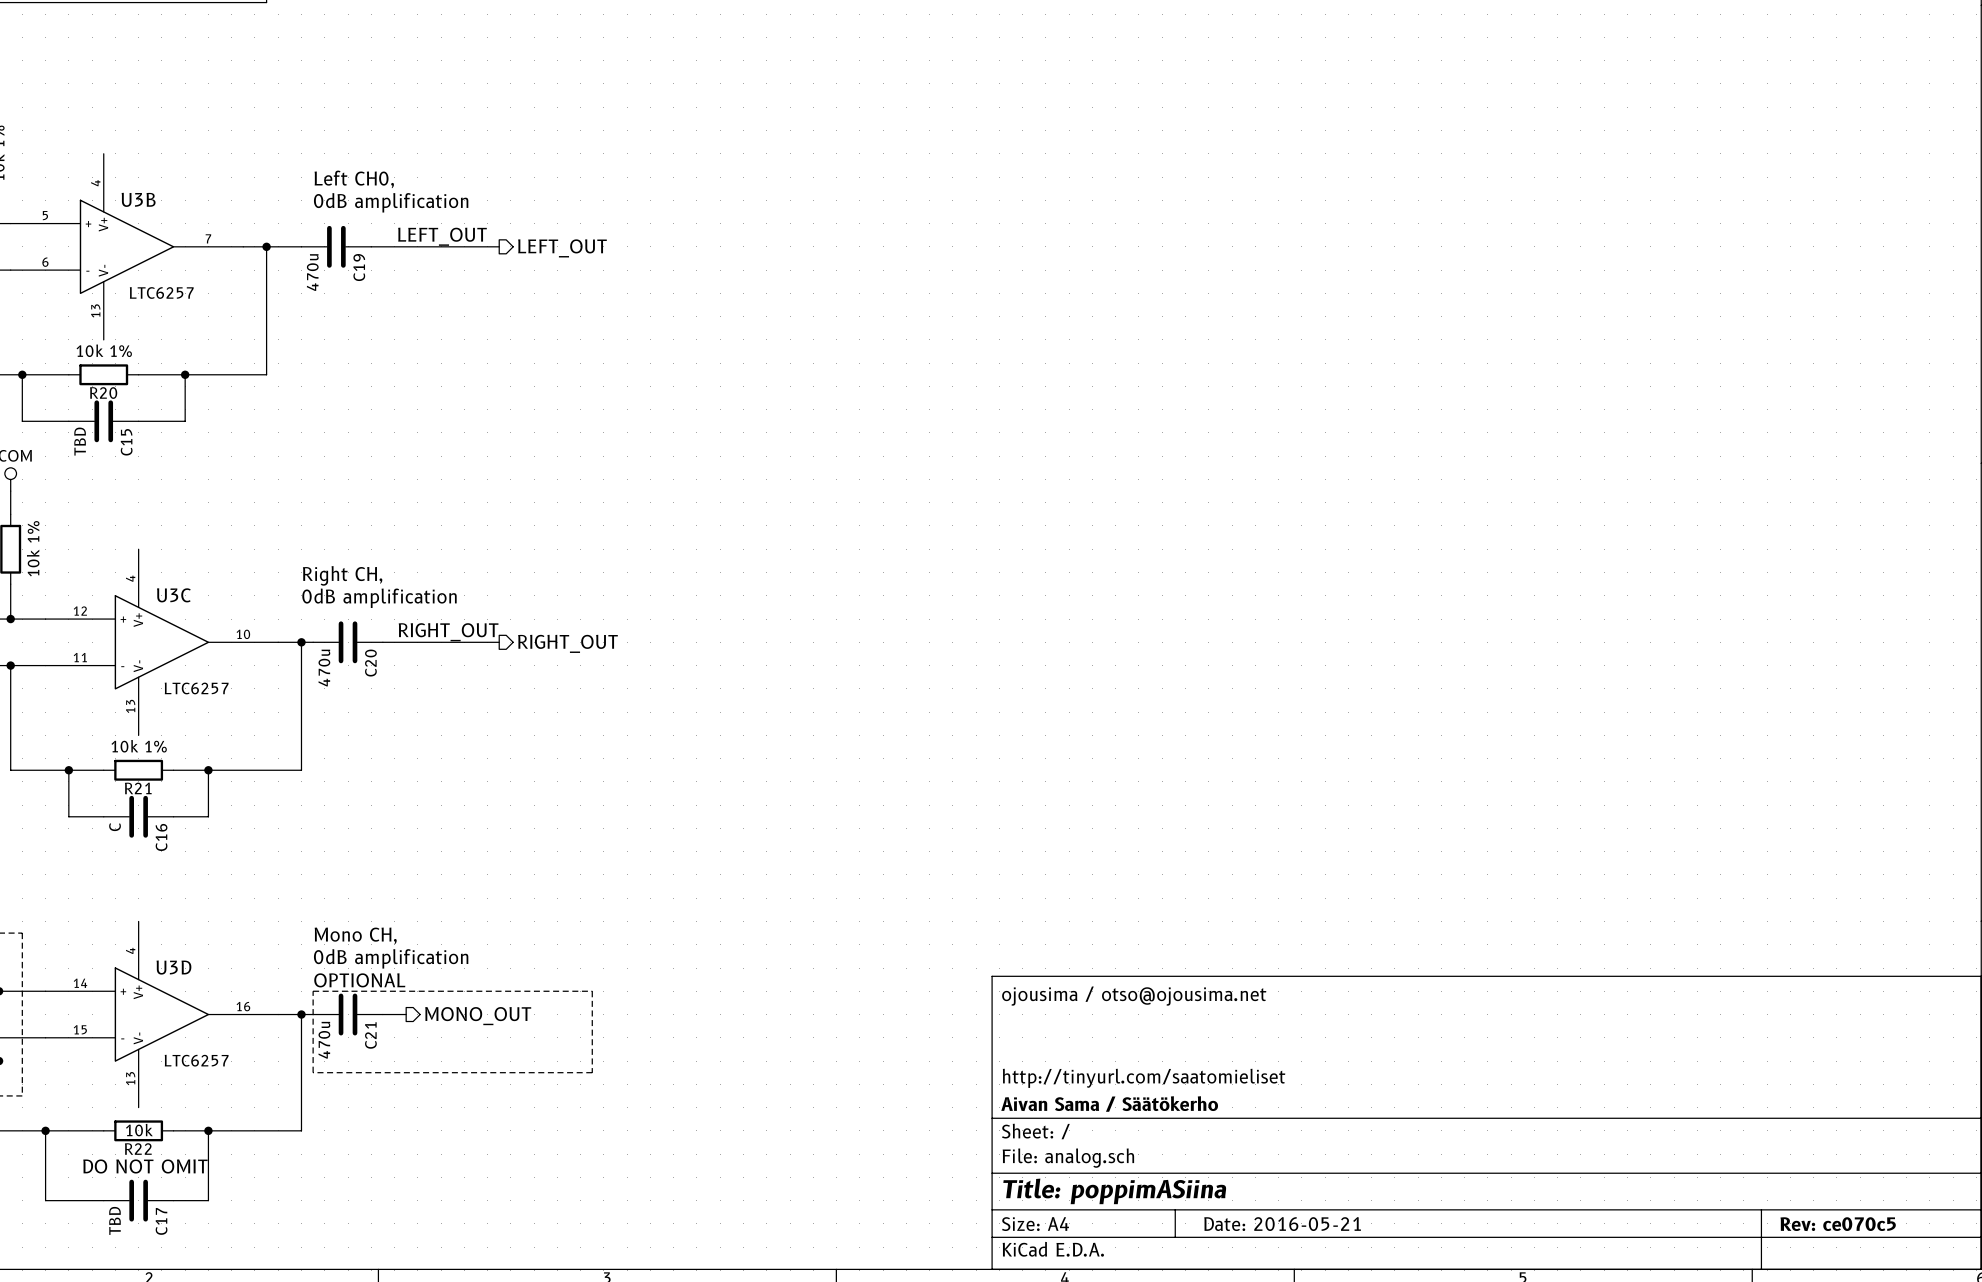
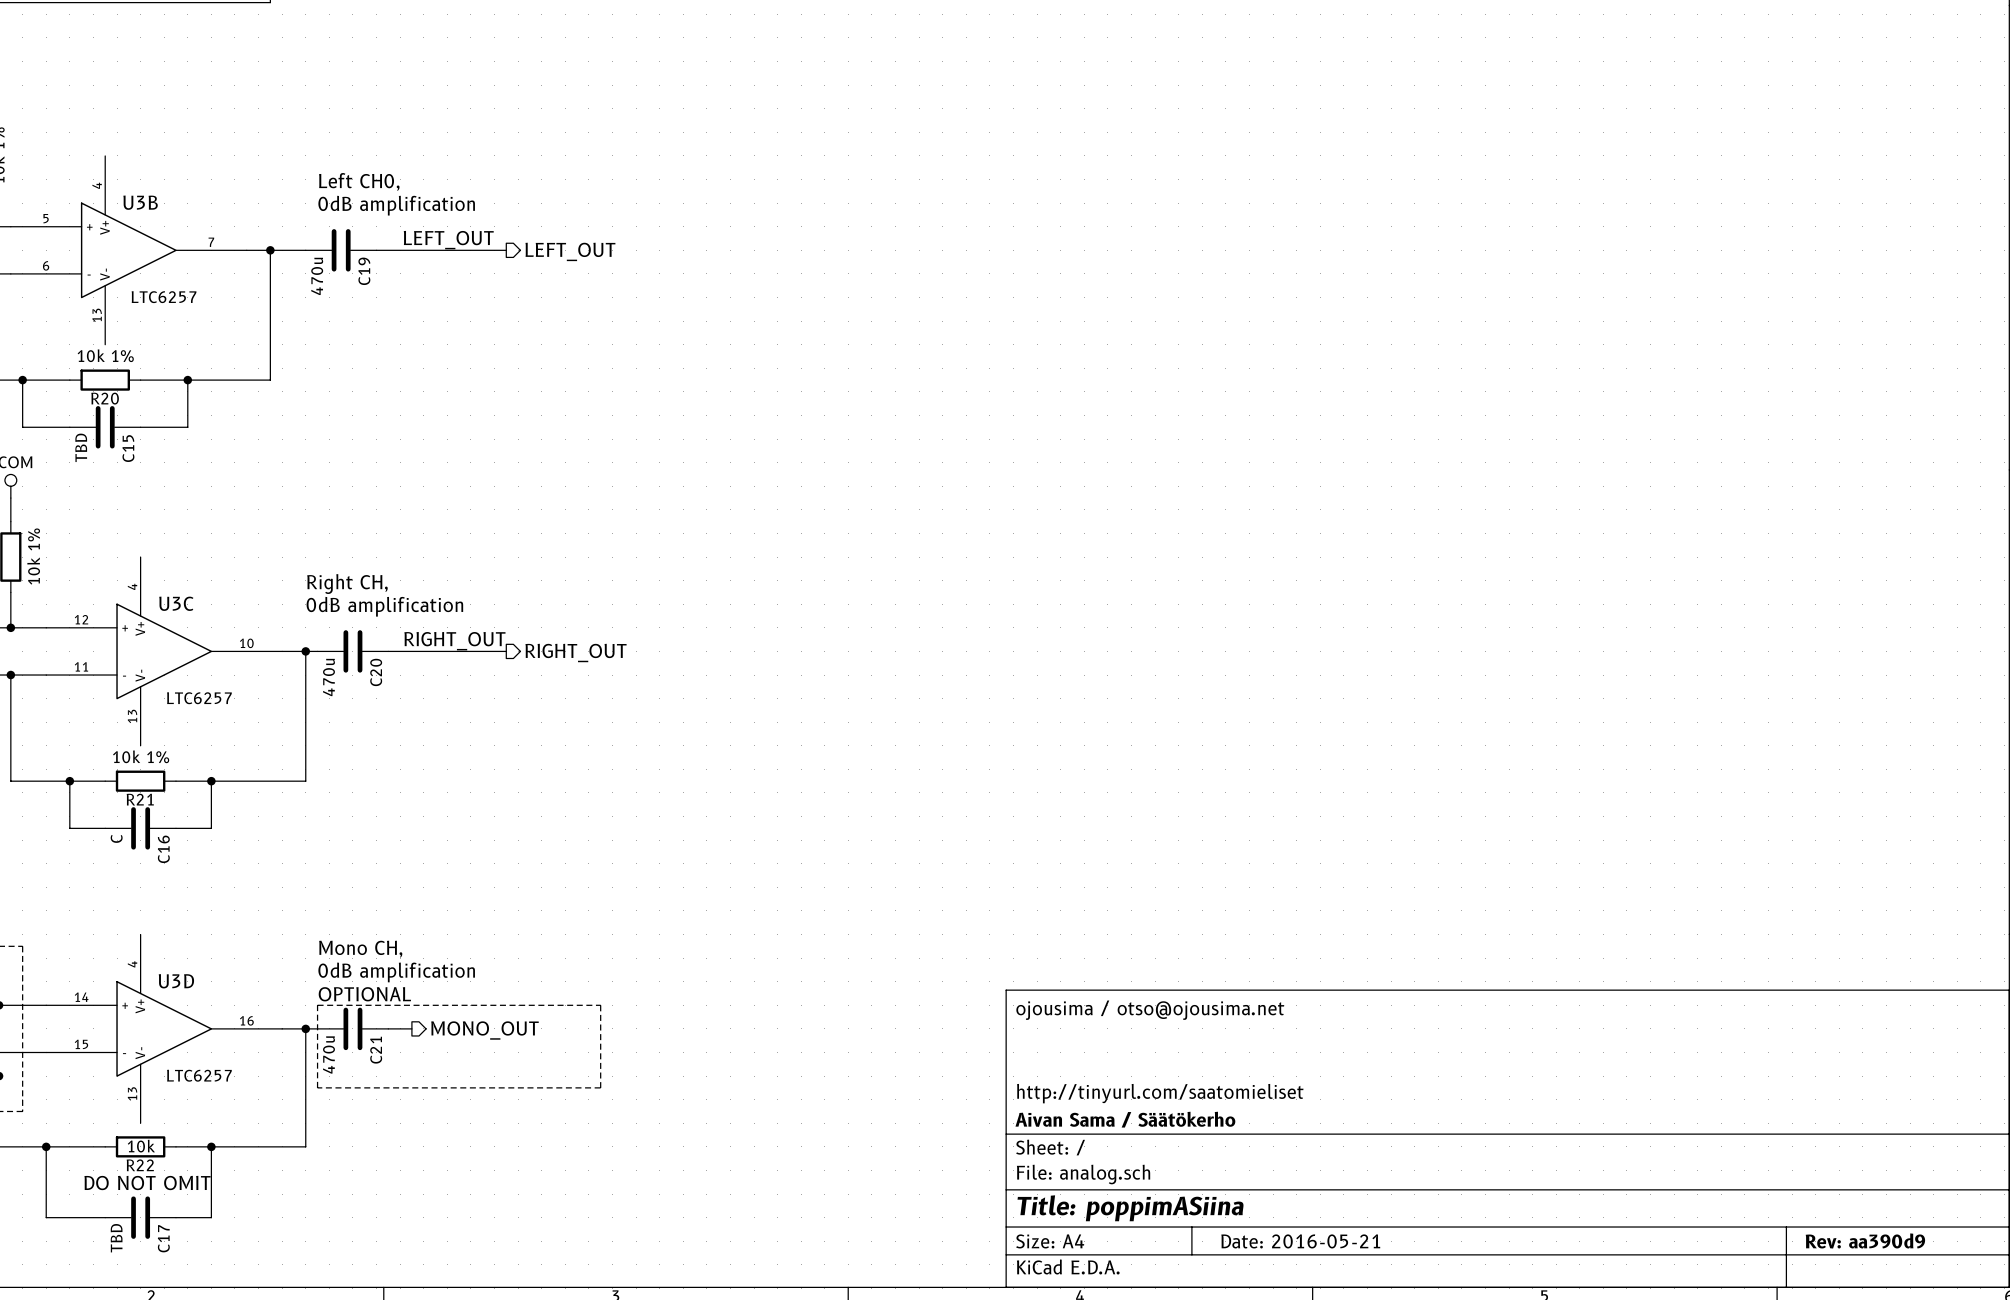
title block: Rev: ce070c5 (1838, 1224) -> Rev: aa390d9 (1865, 1240)

